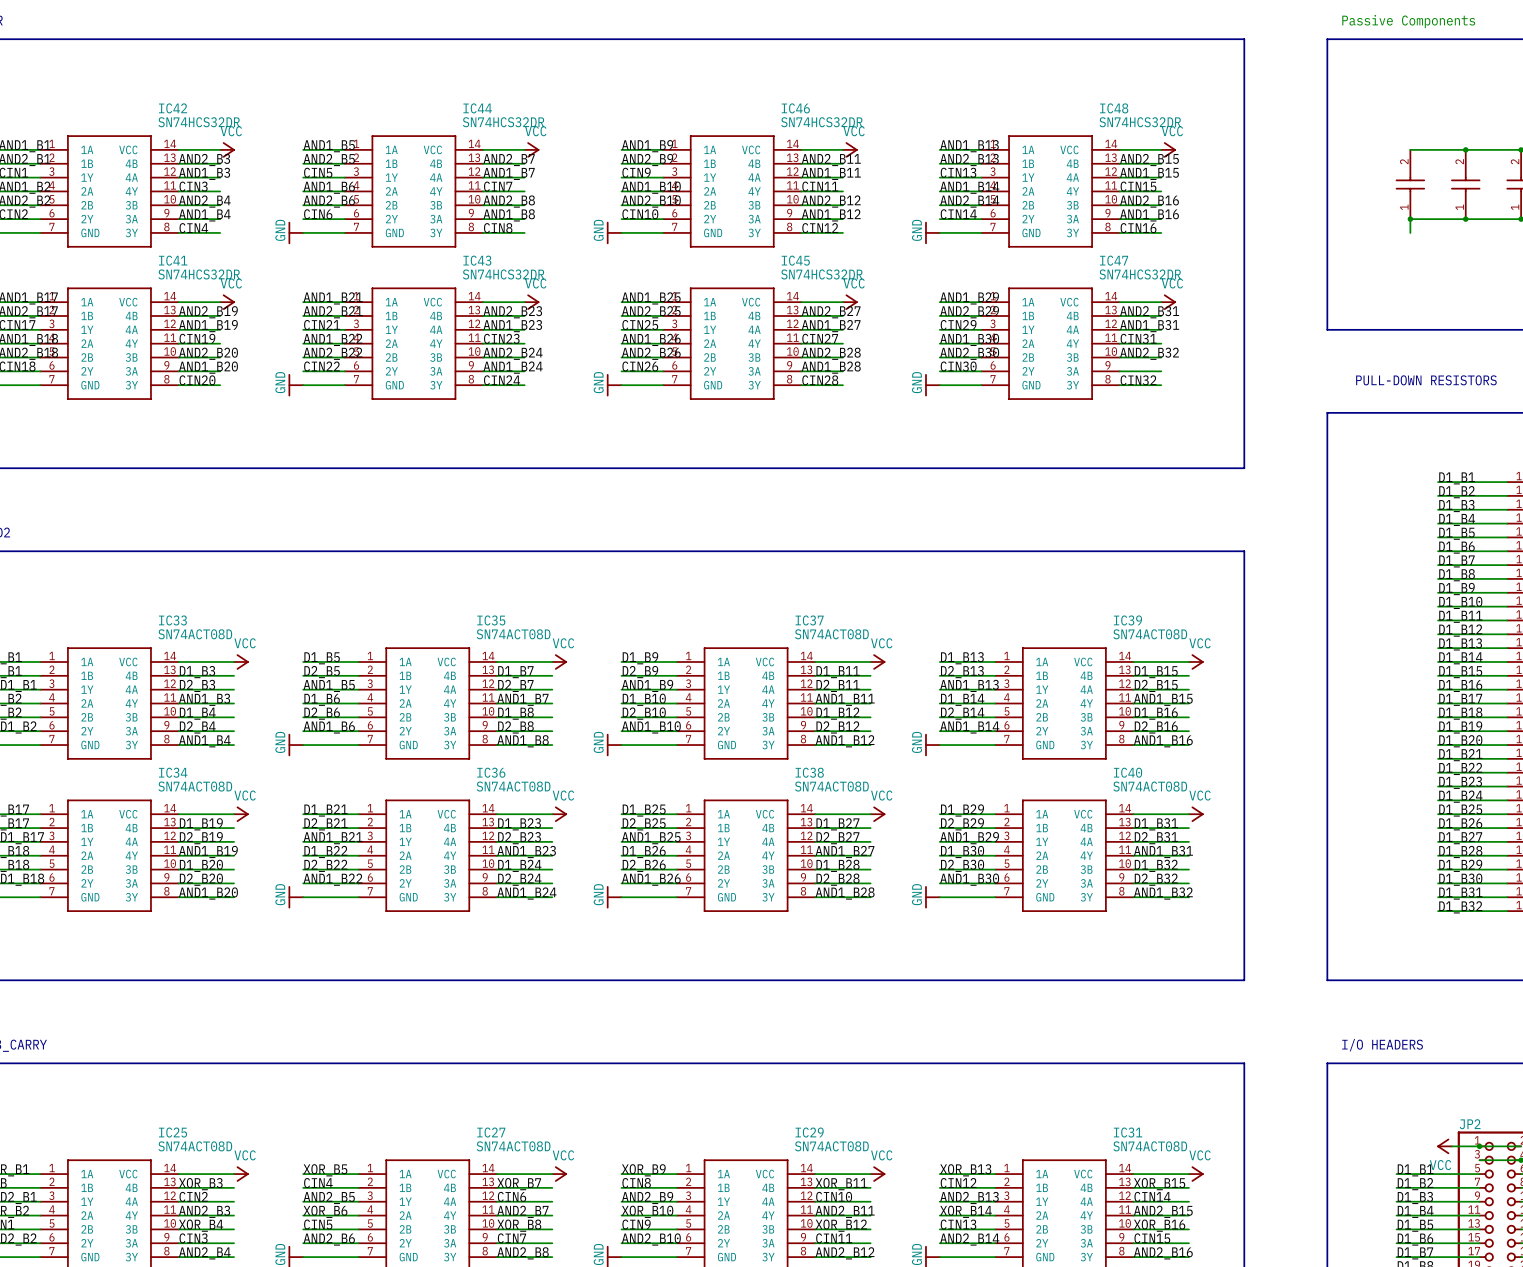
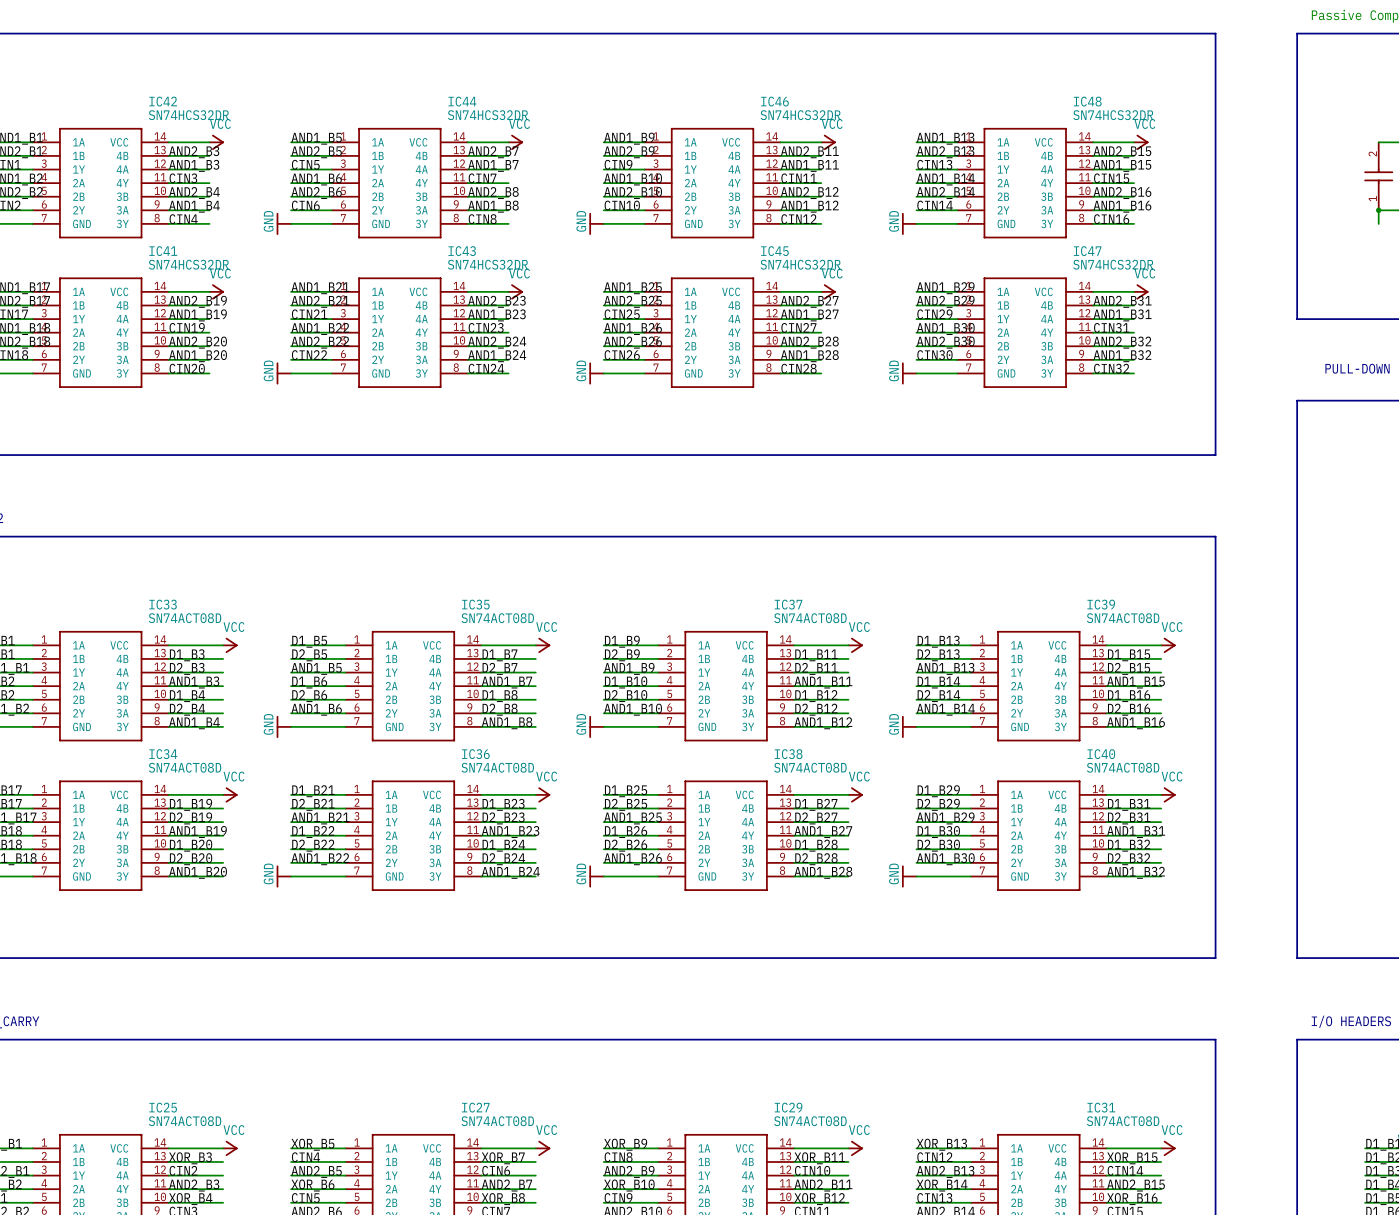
label: none -> AND1_B32 (1122, 356)

